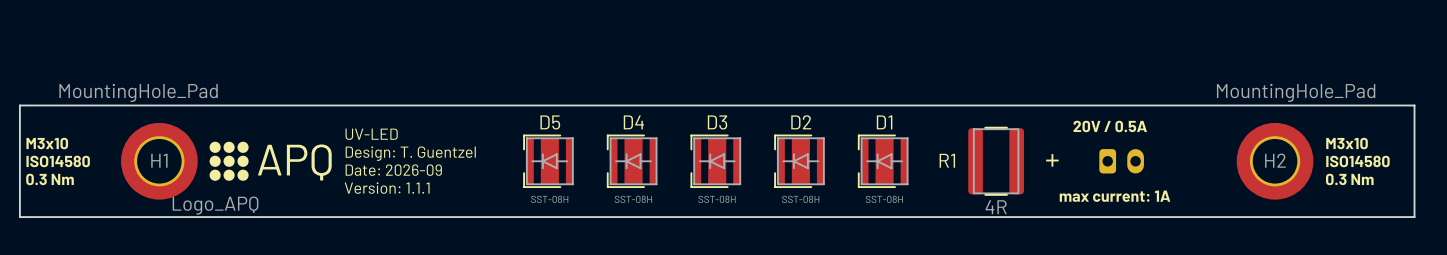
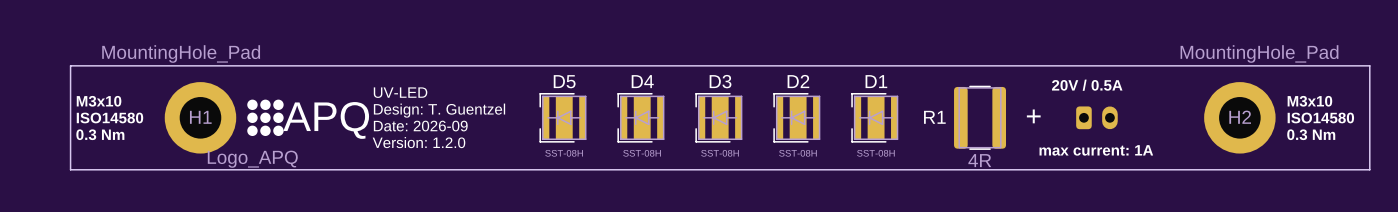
text: Version: 1.1.1 (387, 188) -> Version: 1.2.0 (418, 142)

